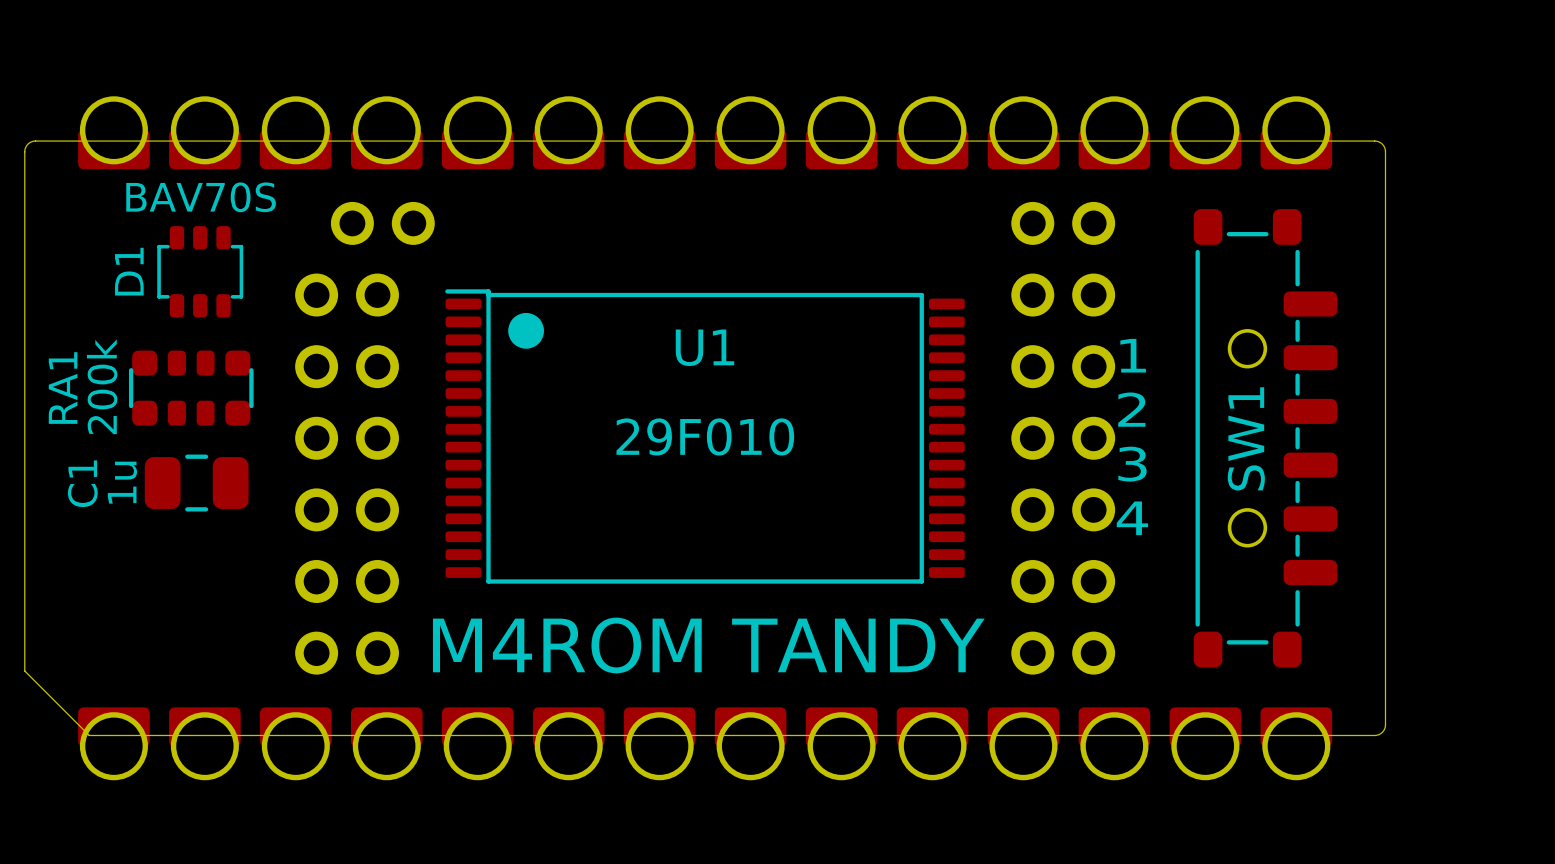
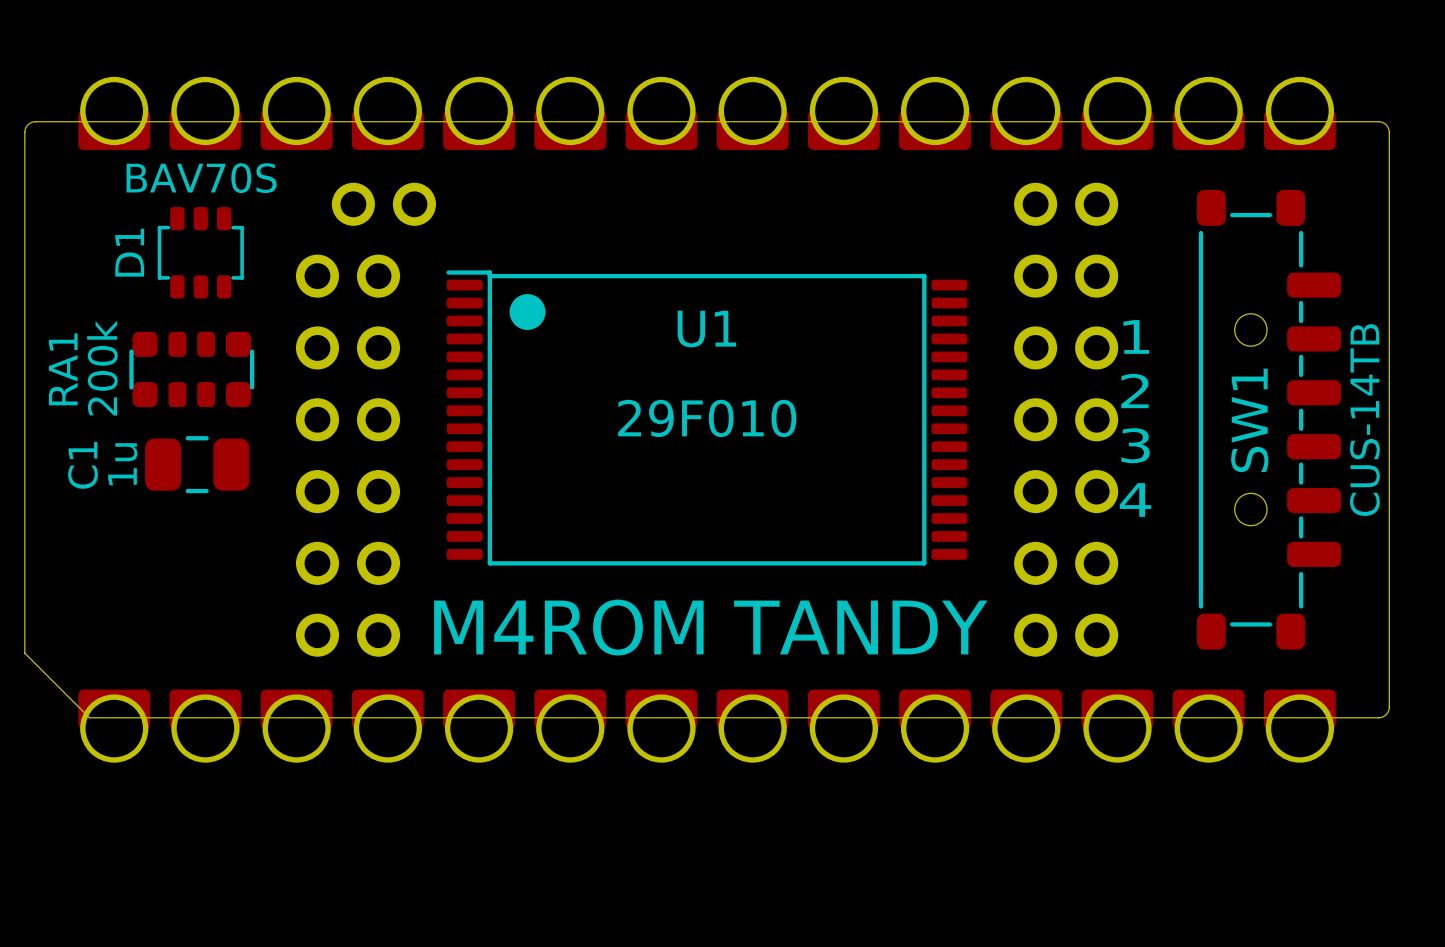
SW1 footprint: [1193, 209, 1338, 668] -> [1197, 189, 1342, 650]
SW1 value: none -> CUS-14TB (1364, 420)

